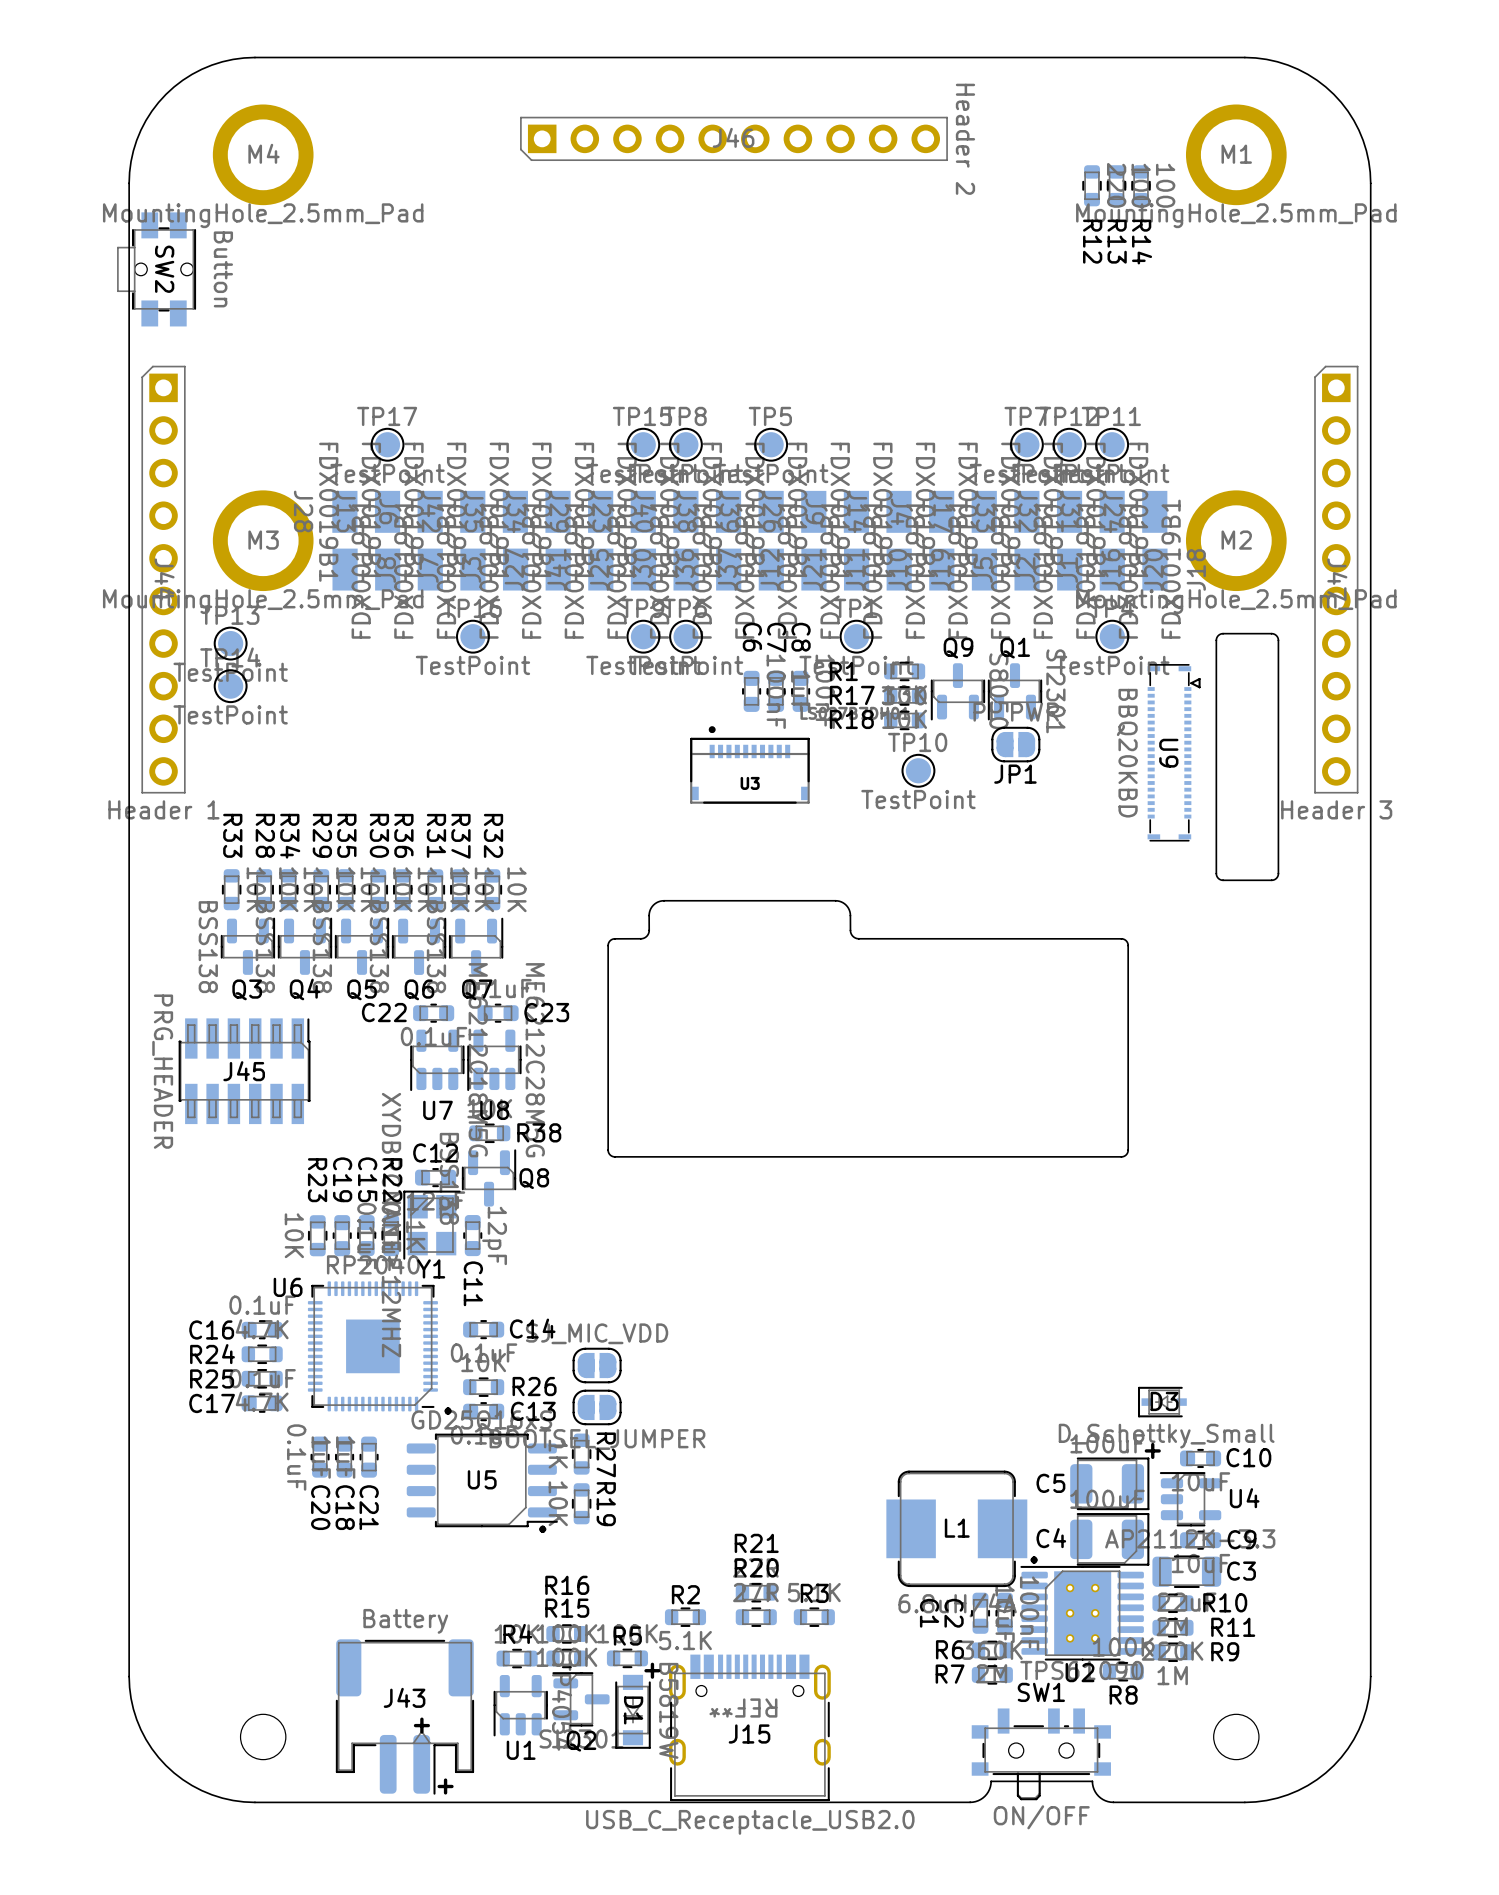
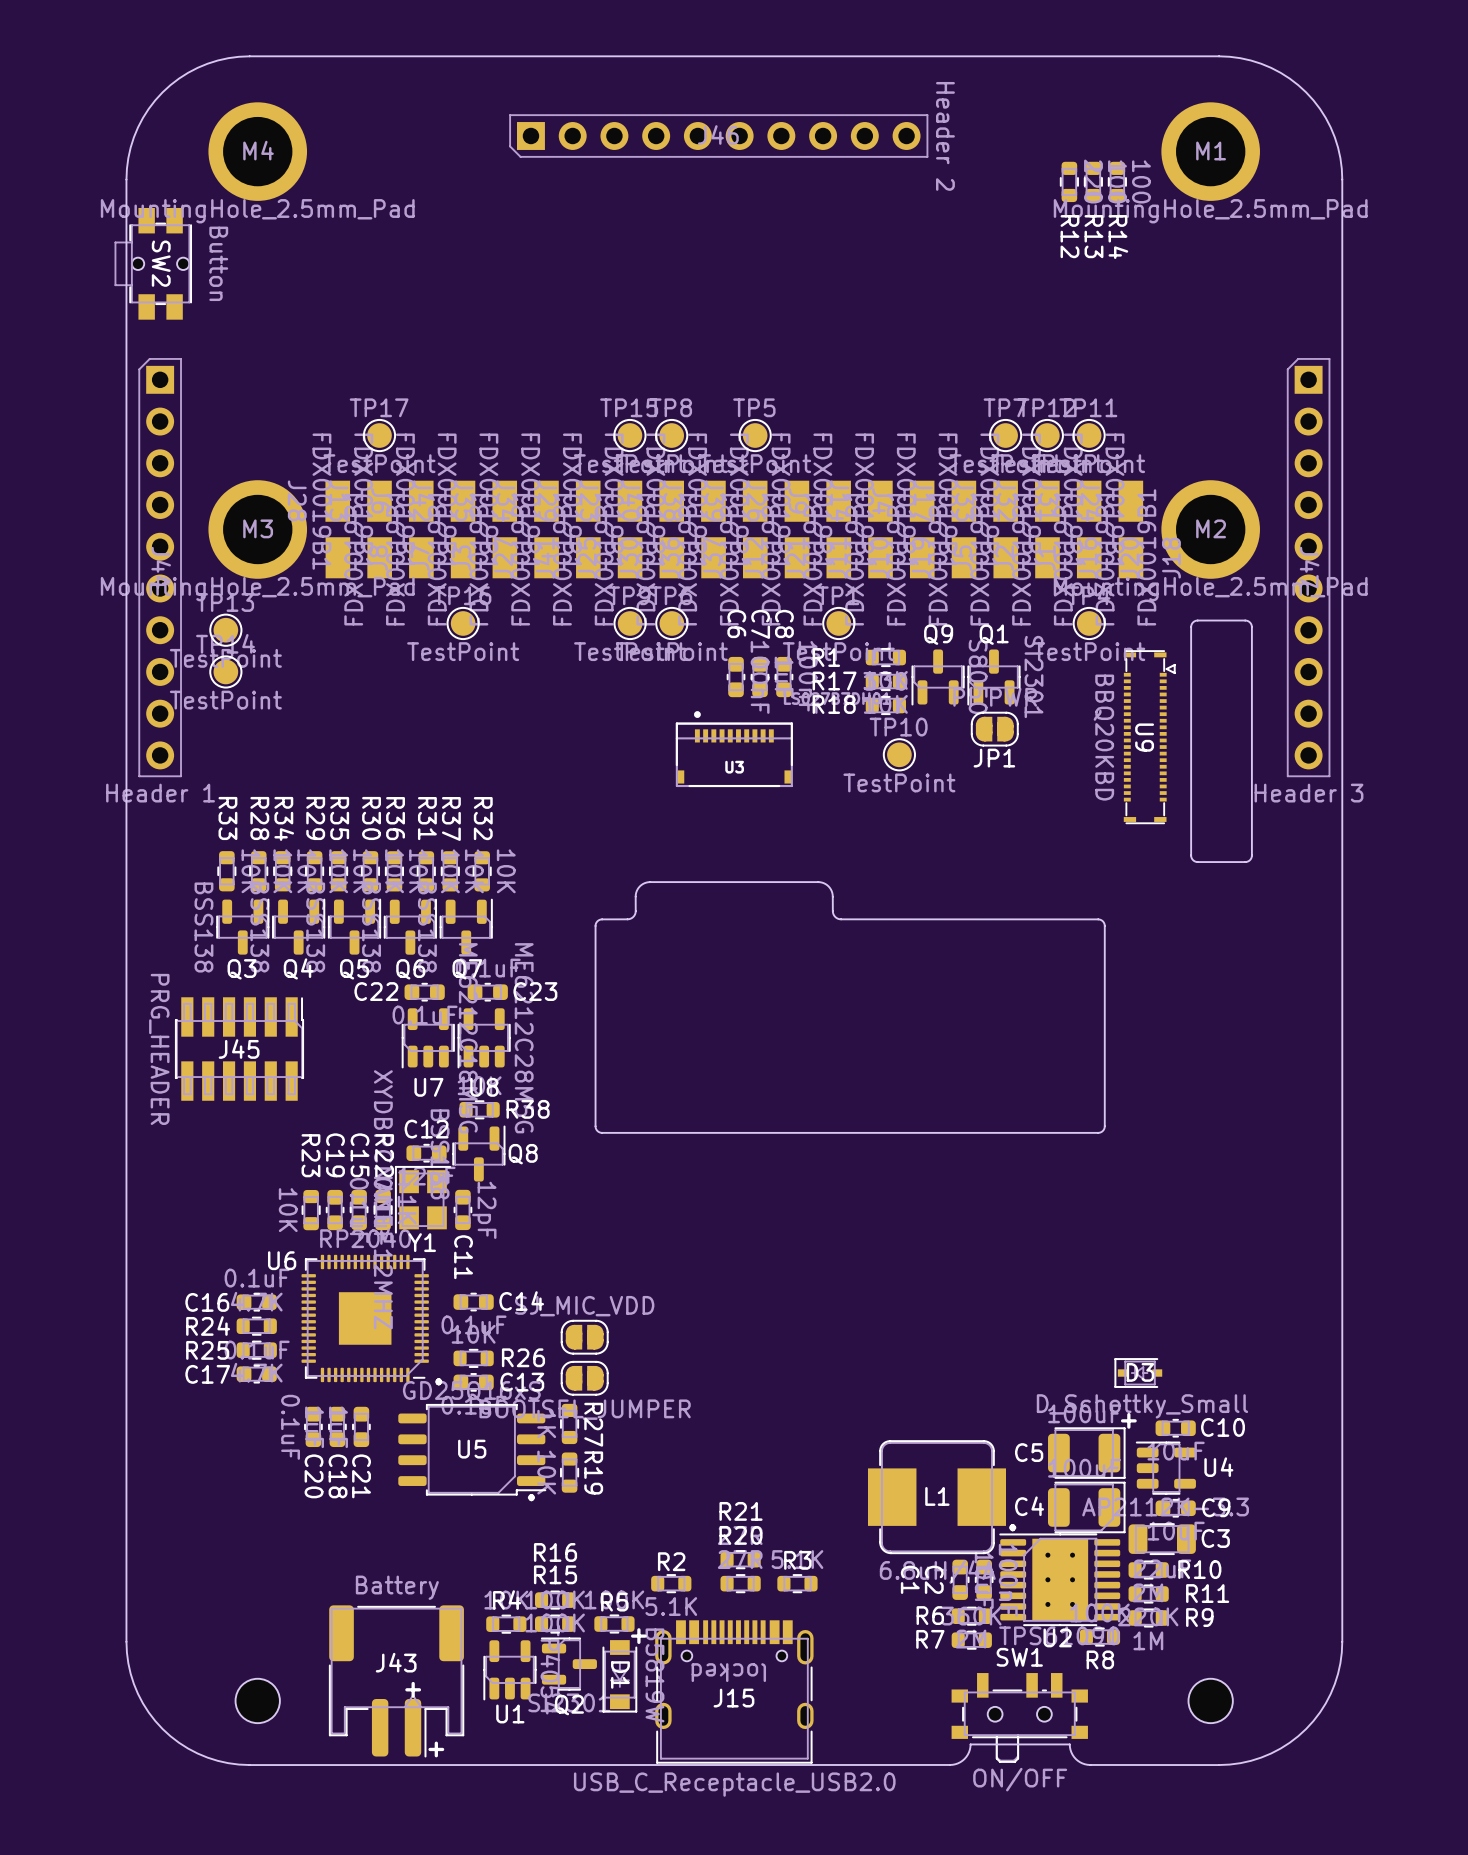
text: REF** (743, 1708) -> locked (728, 1672)

